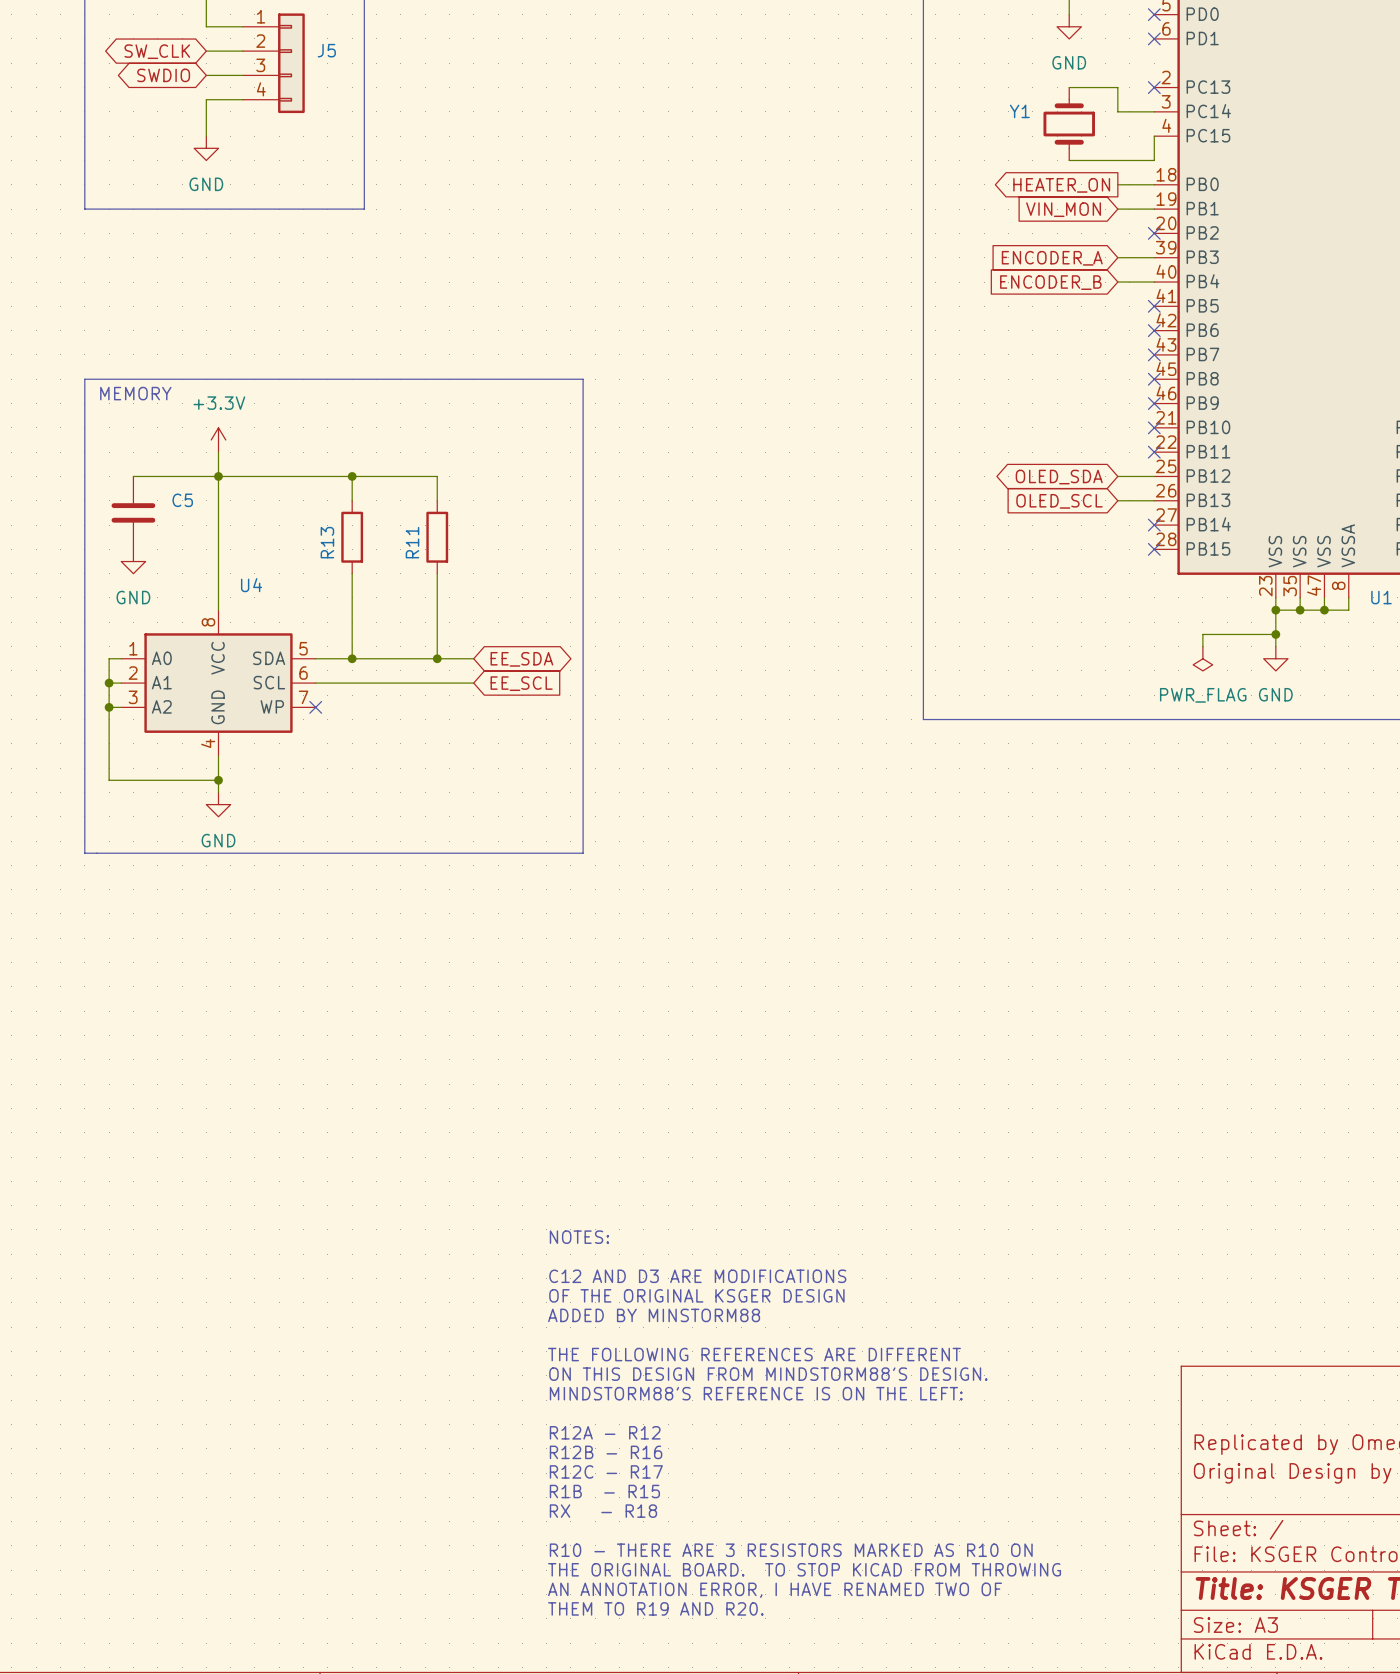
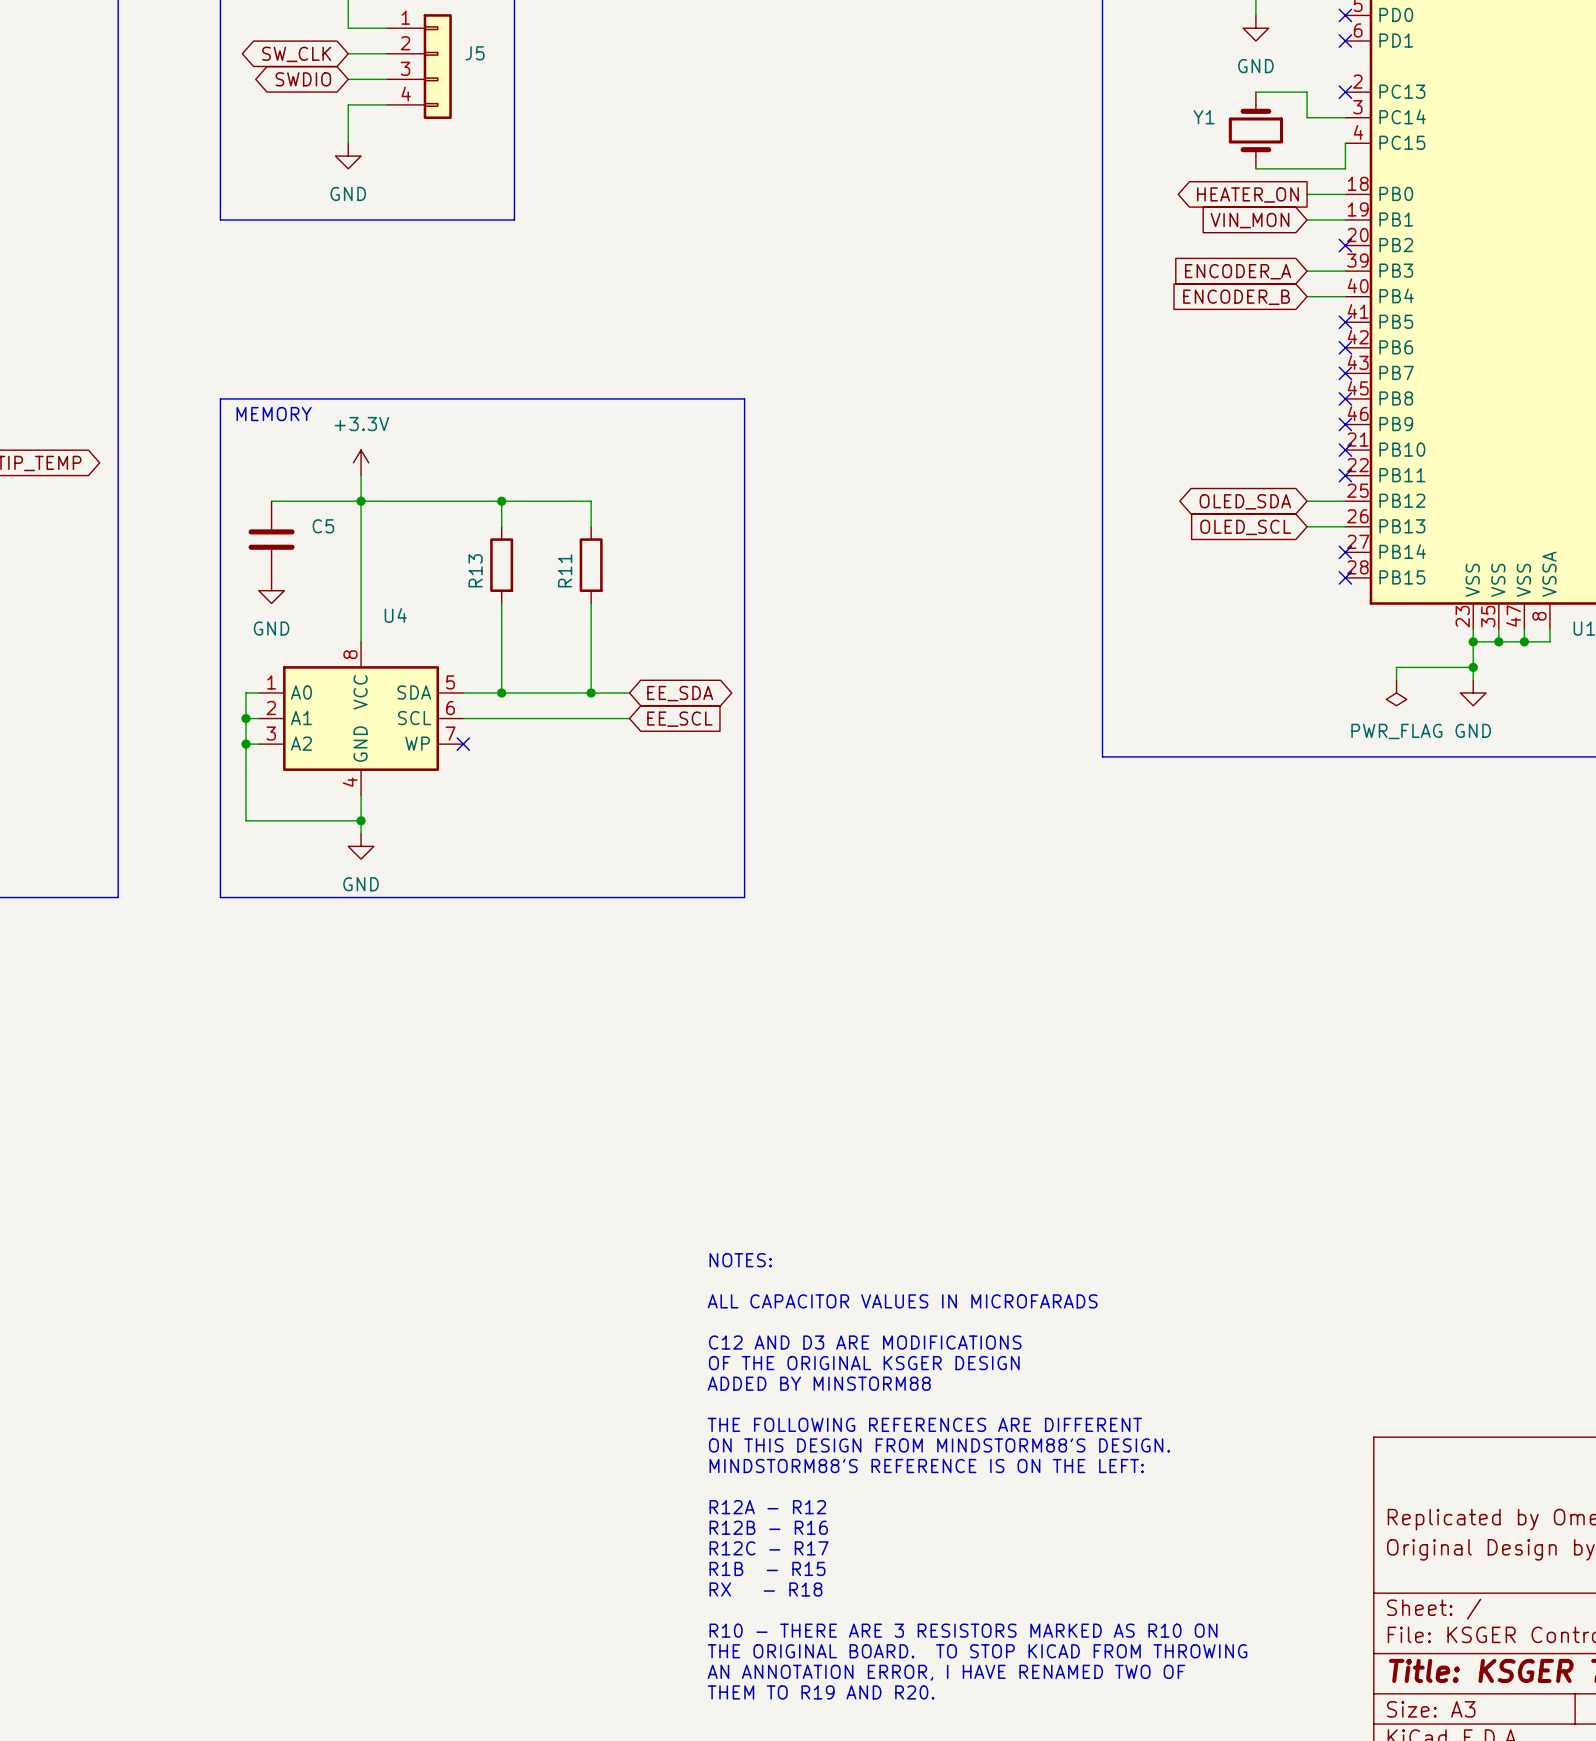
text: none -> NOTES: (740, 1260)
text: NOTES: (579, 1237) -> ALL CAPACITOR VALUES IN MICROFARADS (902, 1301)

